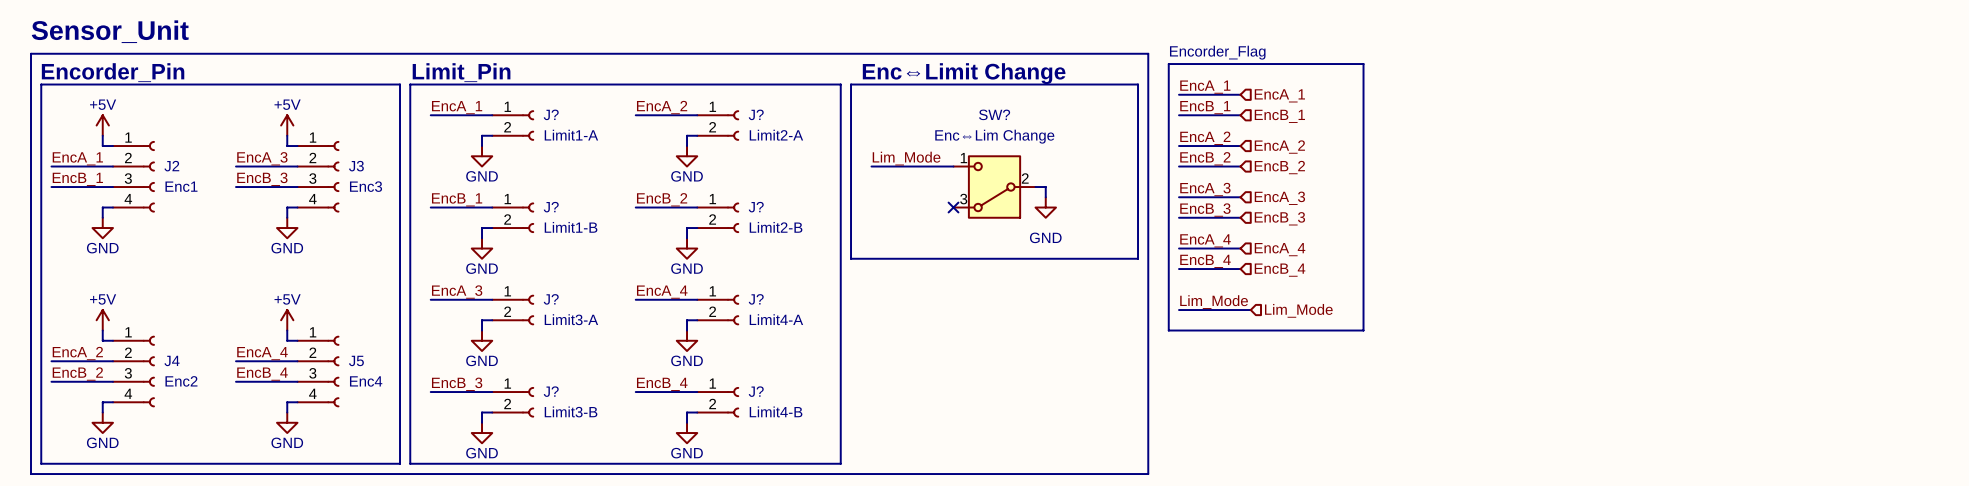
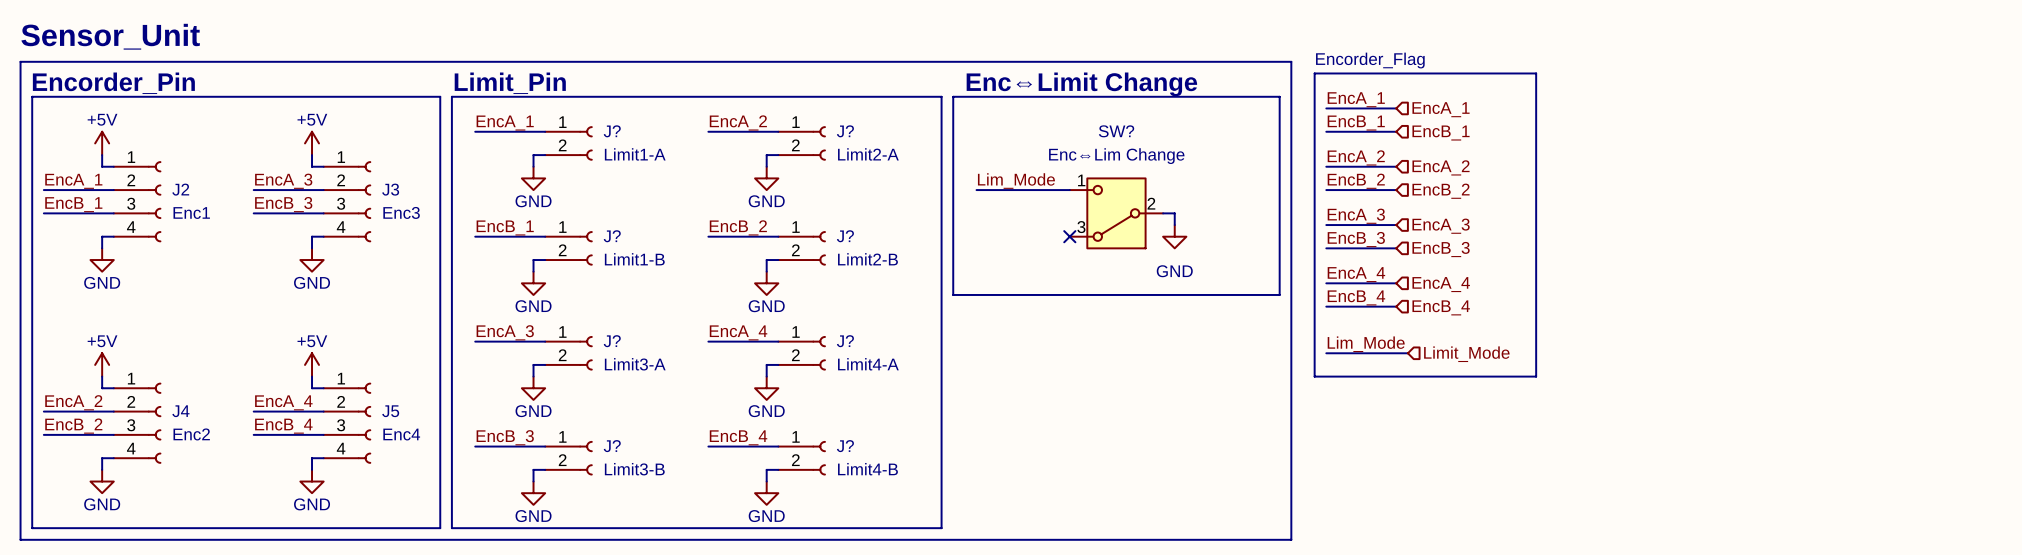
hierarchical label: Lim_Mode (1298, 310) -> Limit_Mode (1466, 354)

